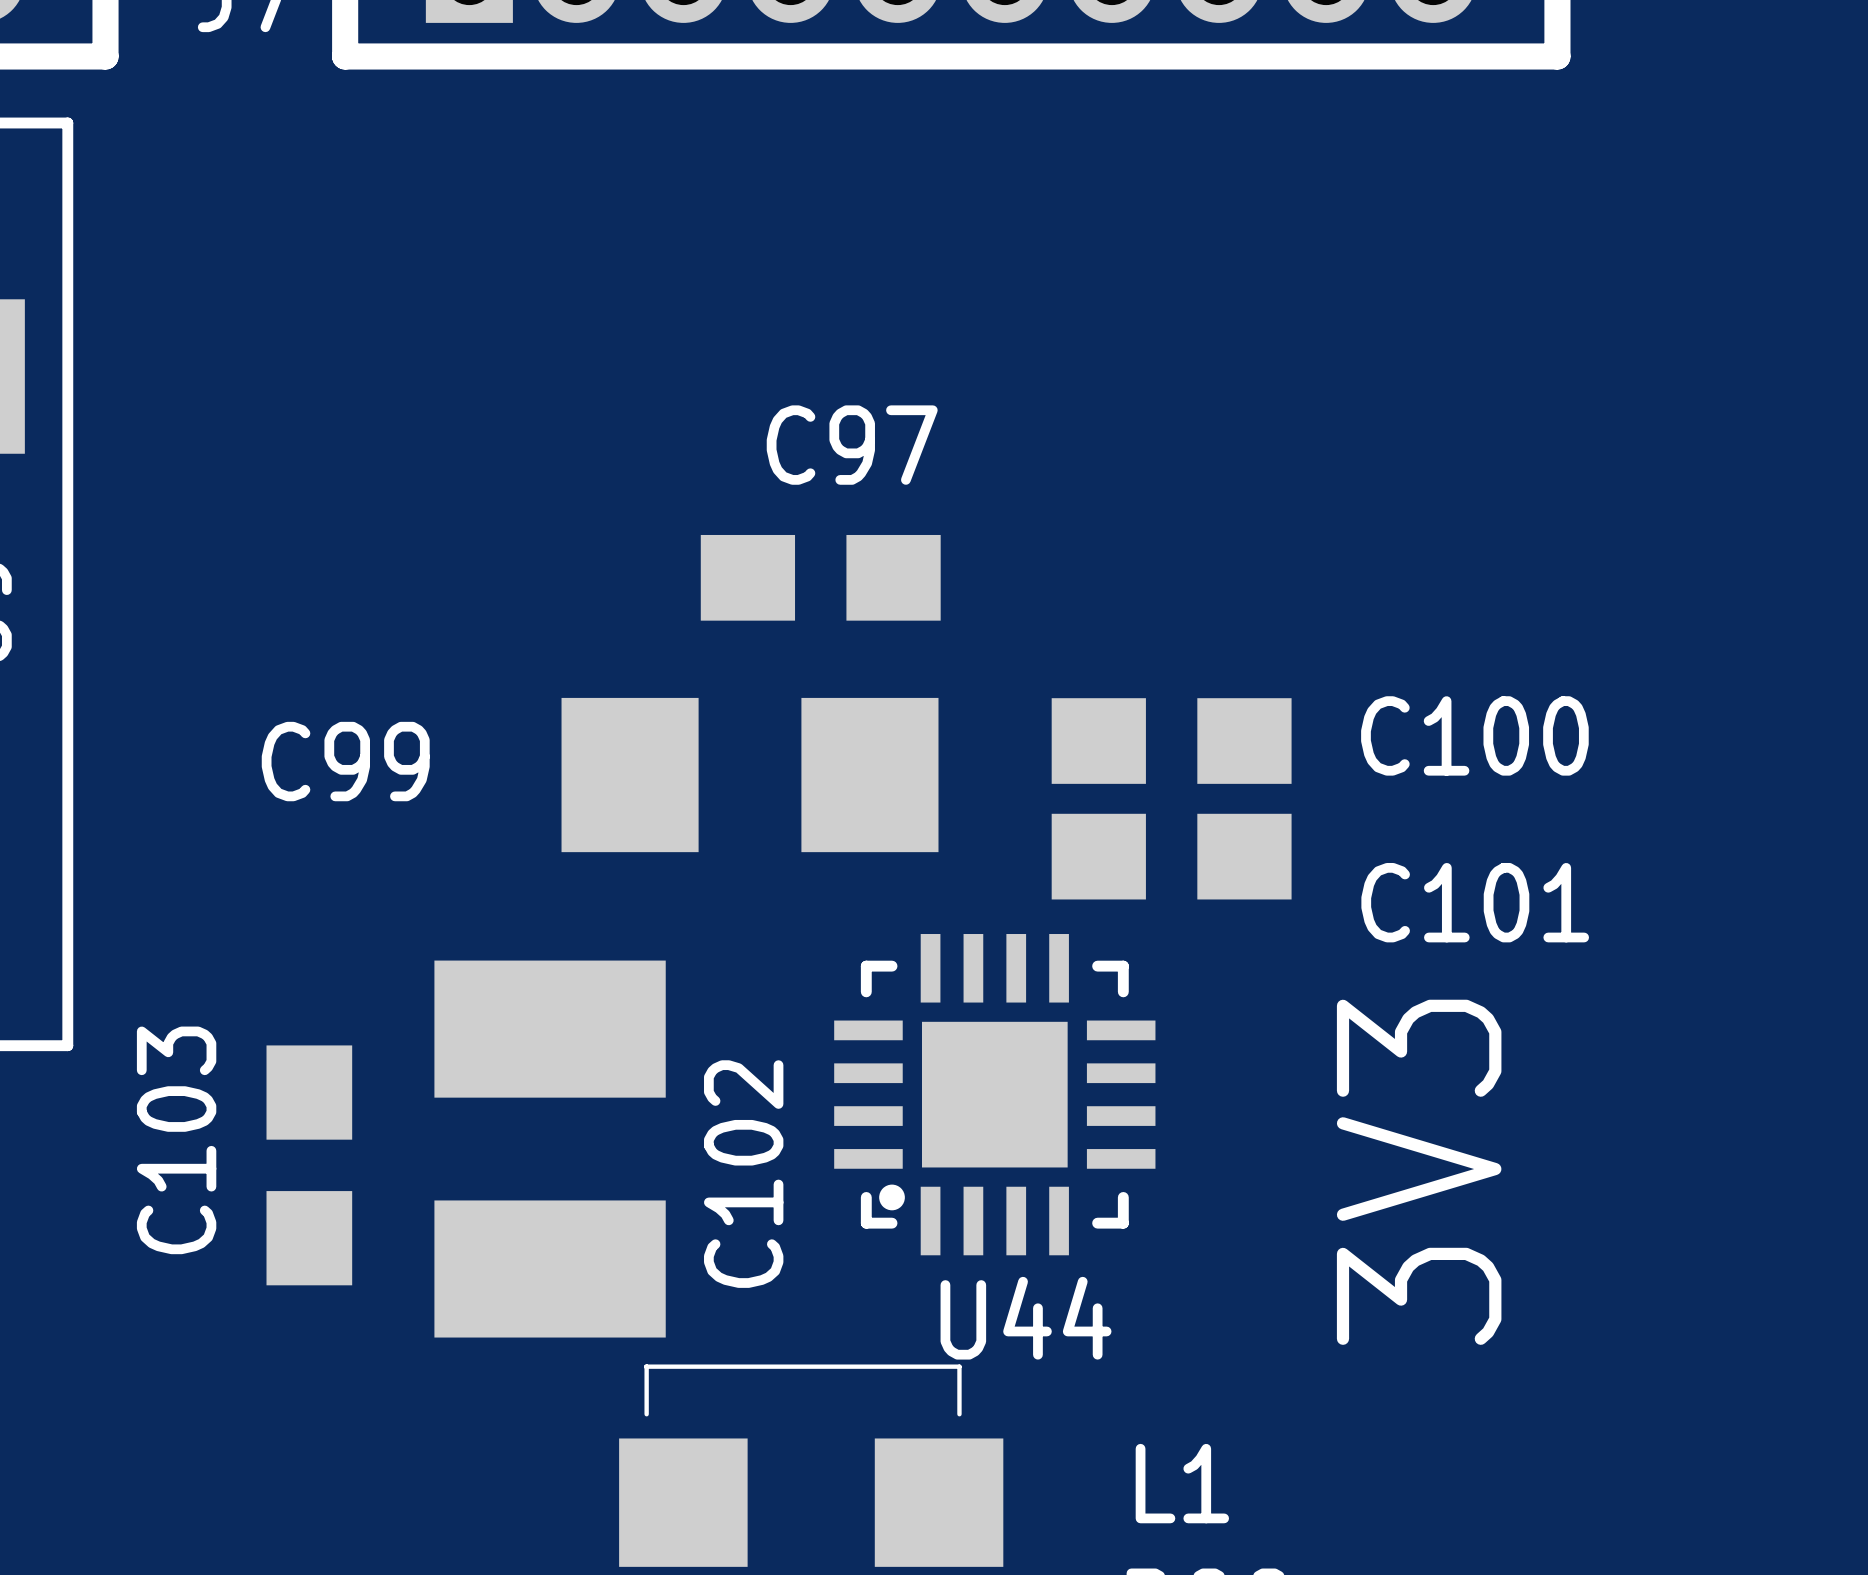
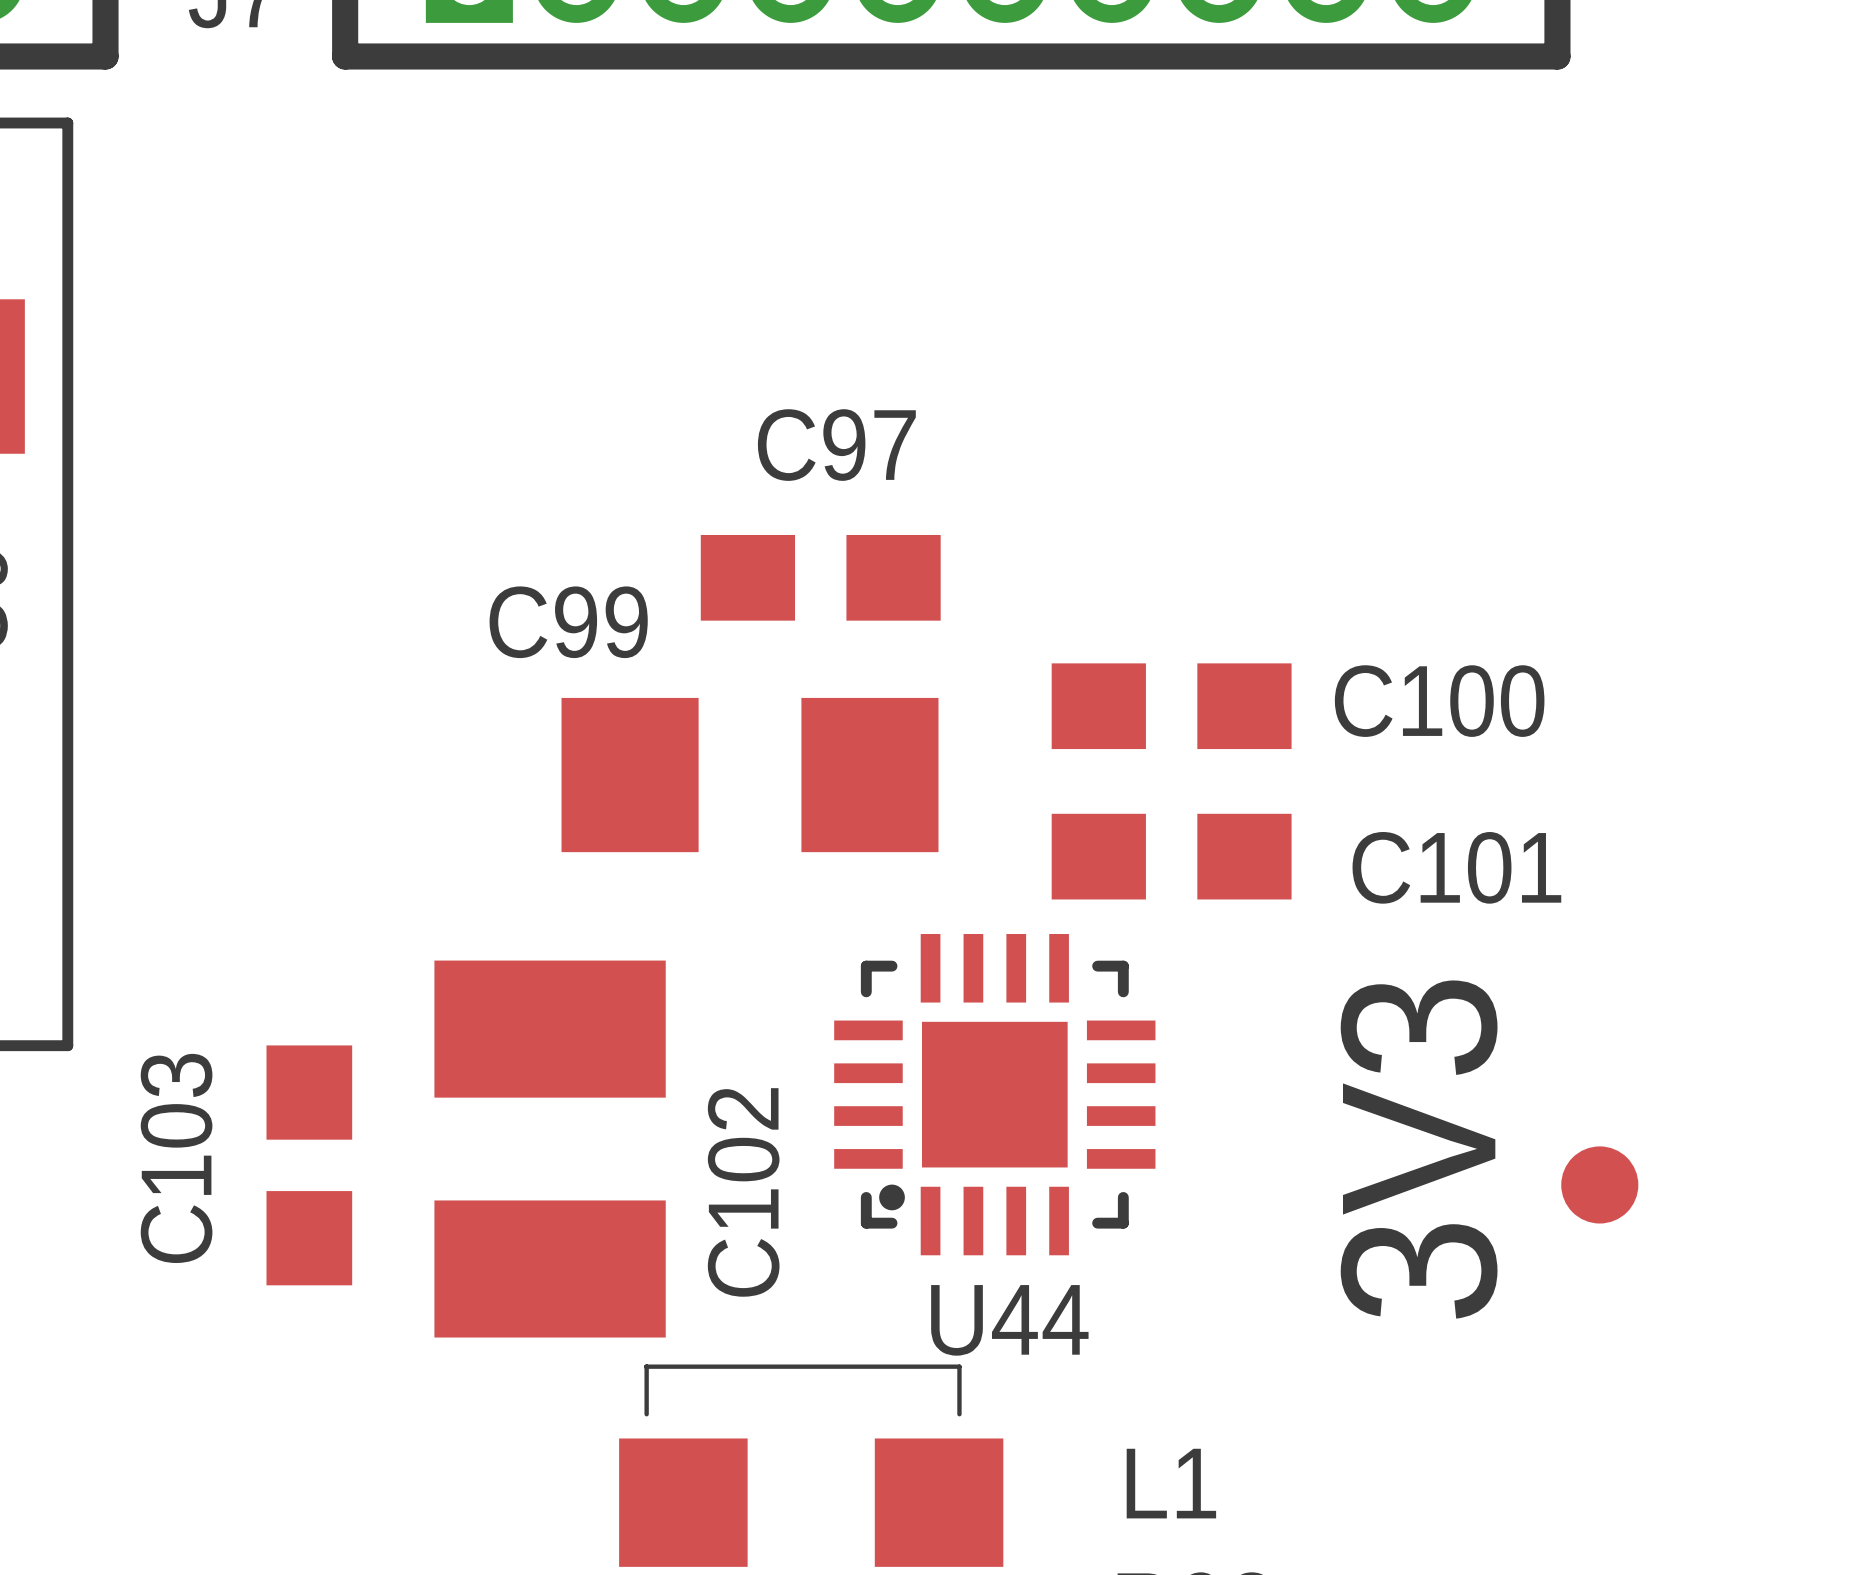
C100 name position: C100 (1474, 735) -> C100 (1439, 701)
C100 position: (1171, 741) -> (1171, 706)
C99 name position: C99 (345, 761) -> C99 (568, 622)
C101 name position: C101 (1475, 902) -> C101 (1456, 867)
part: none -> (1599, 1184)

